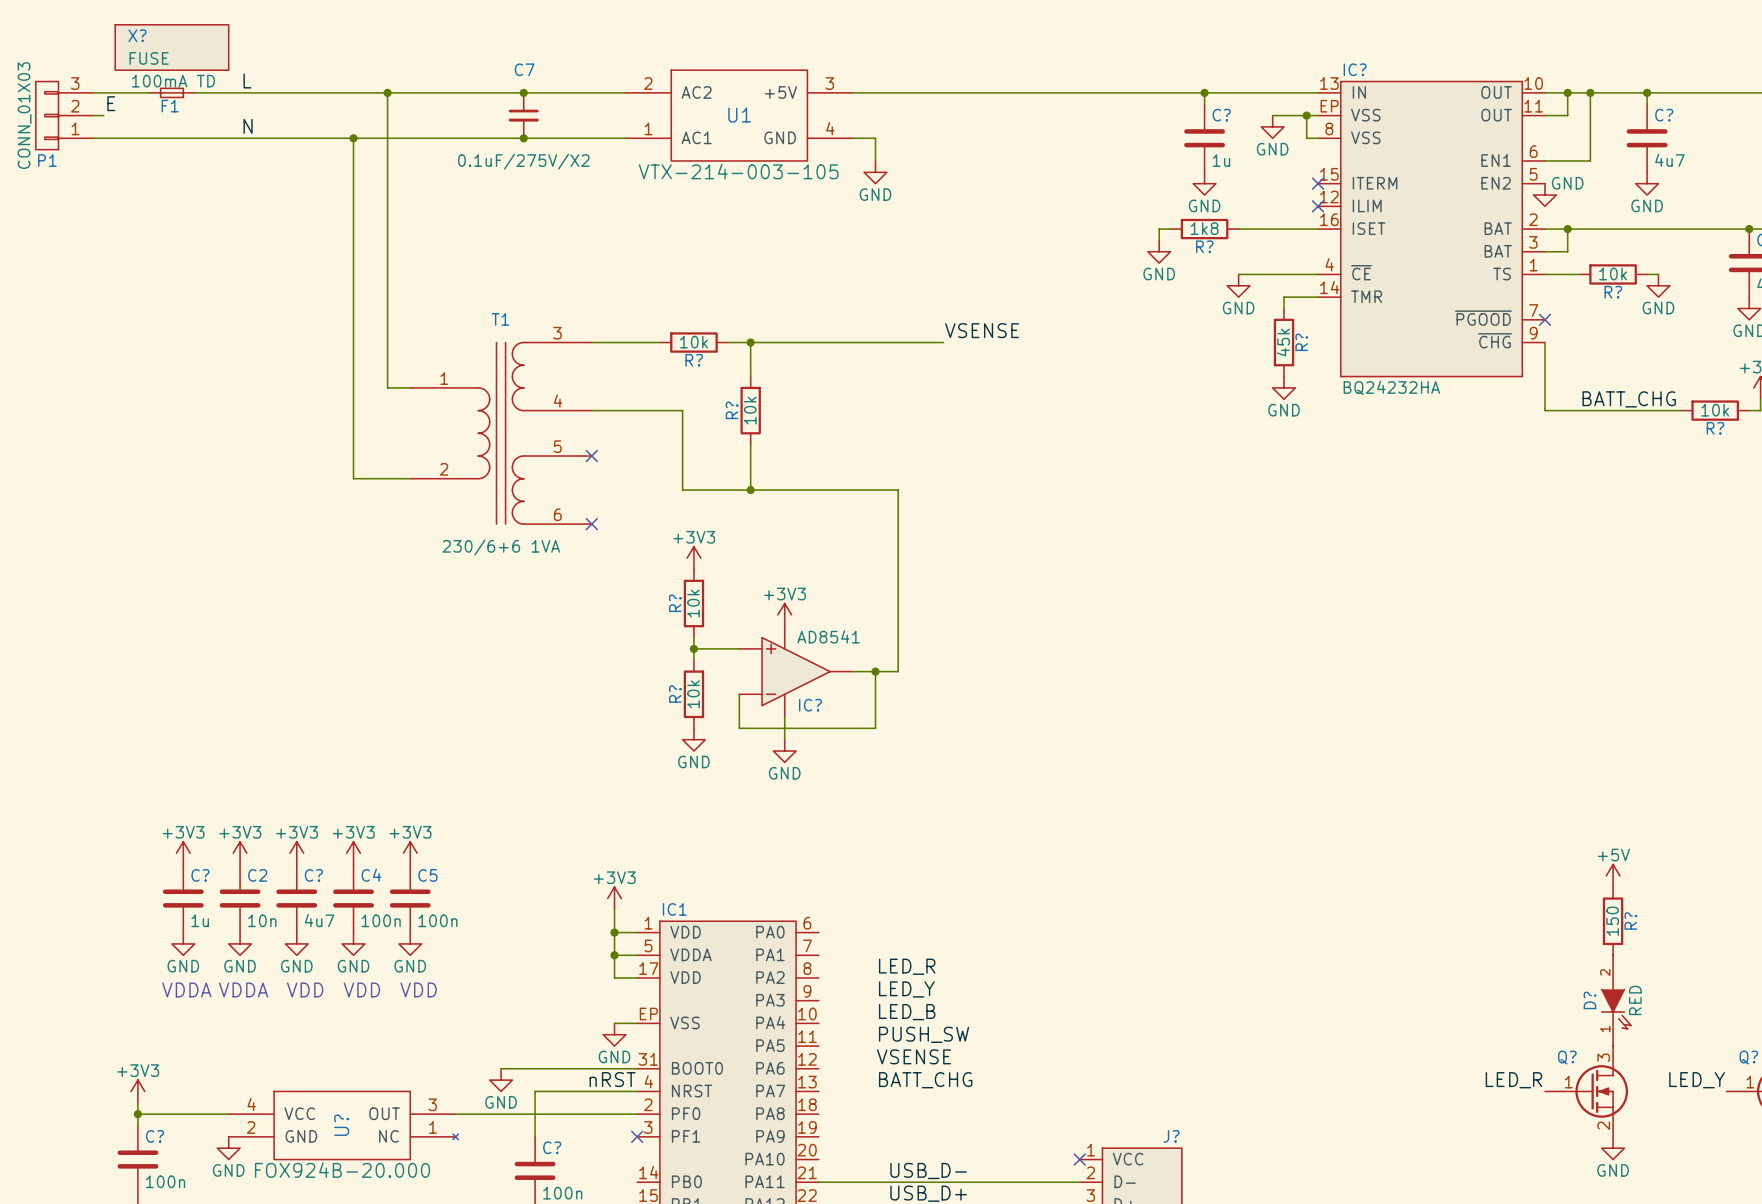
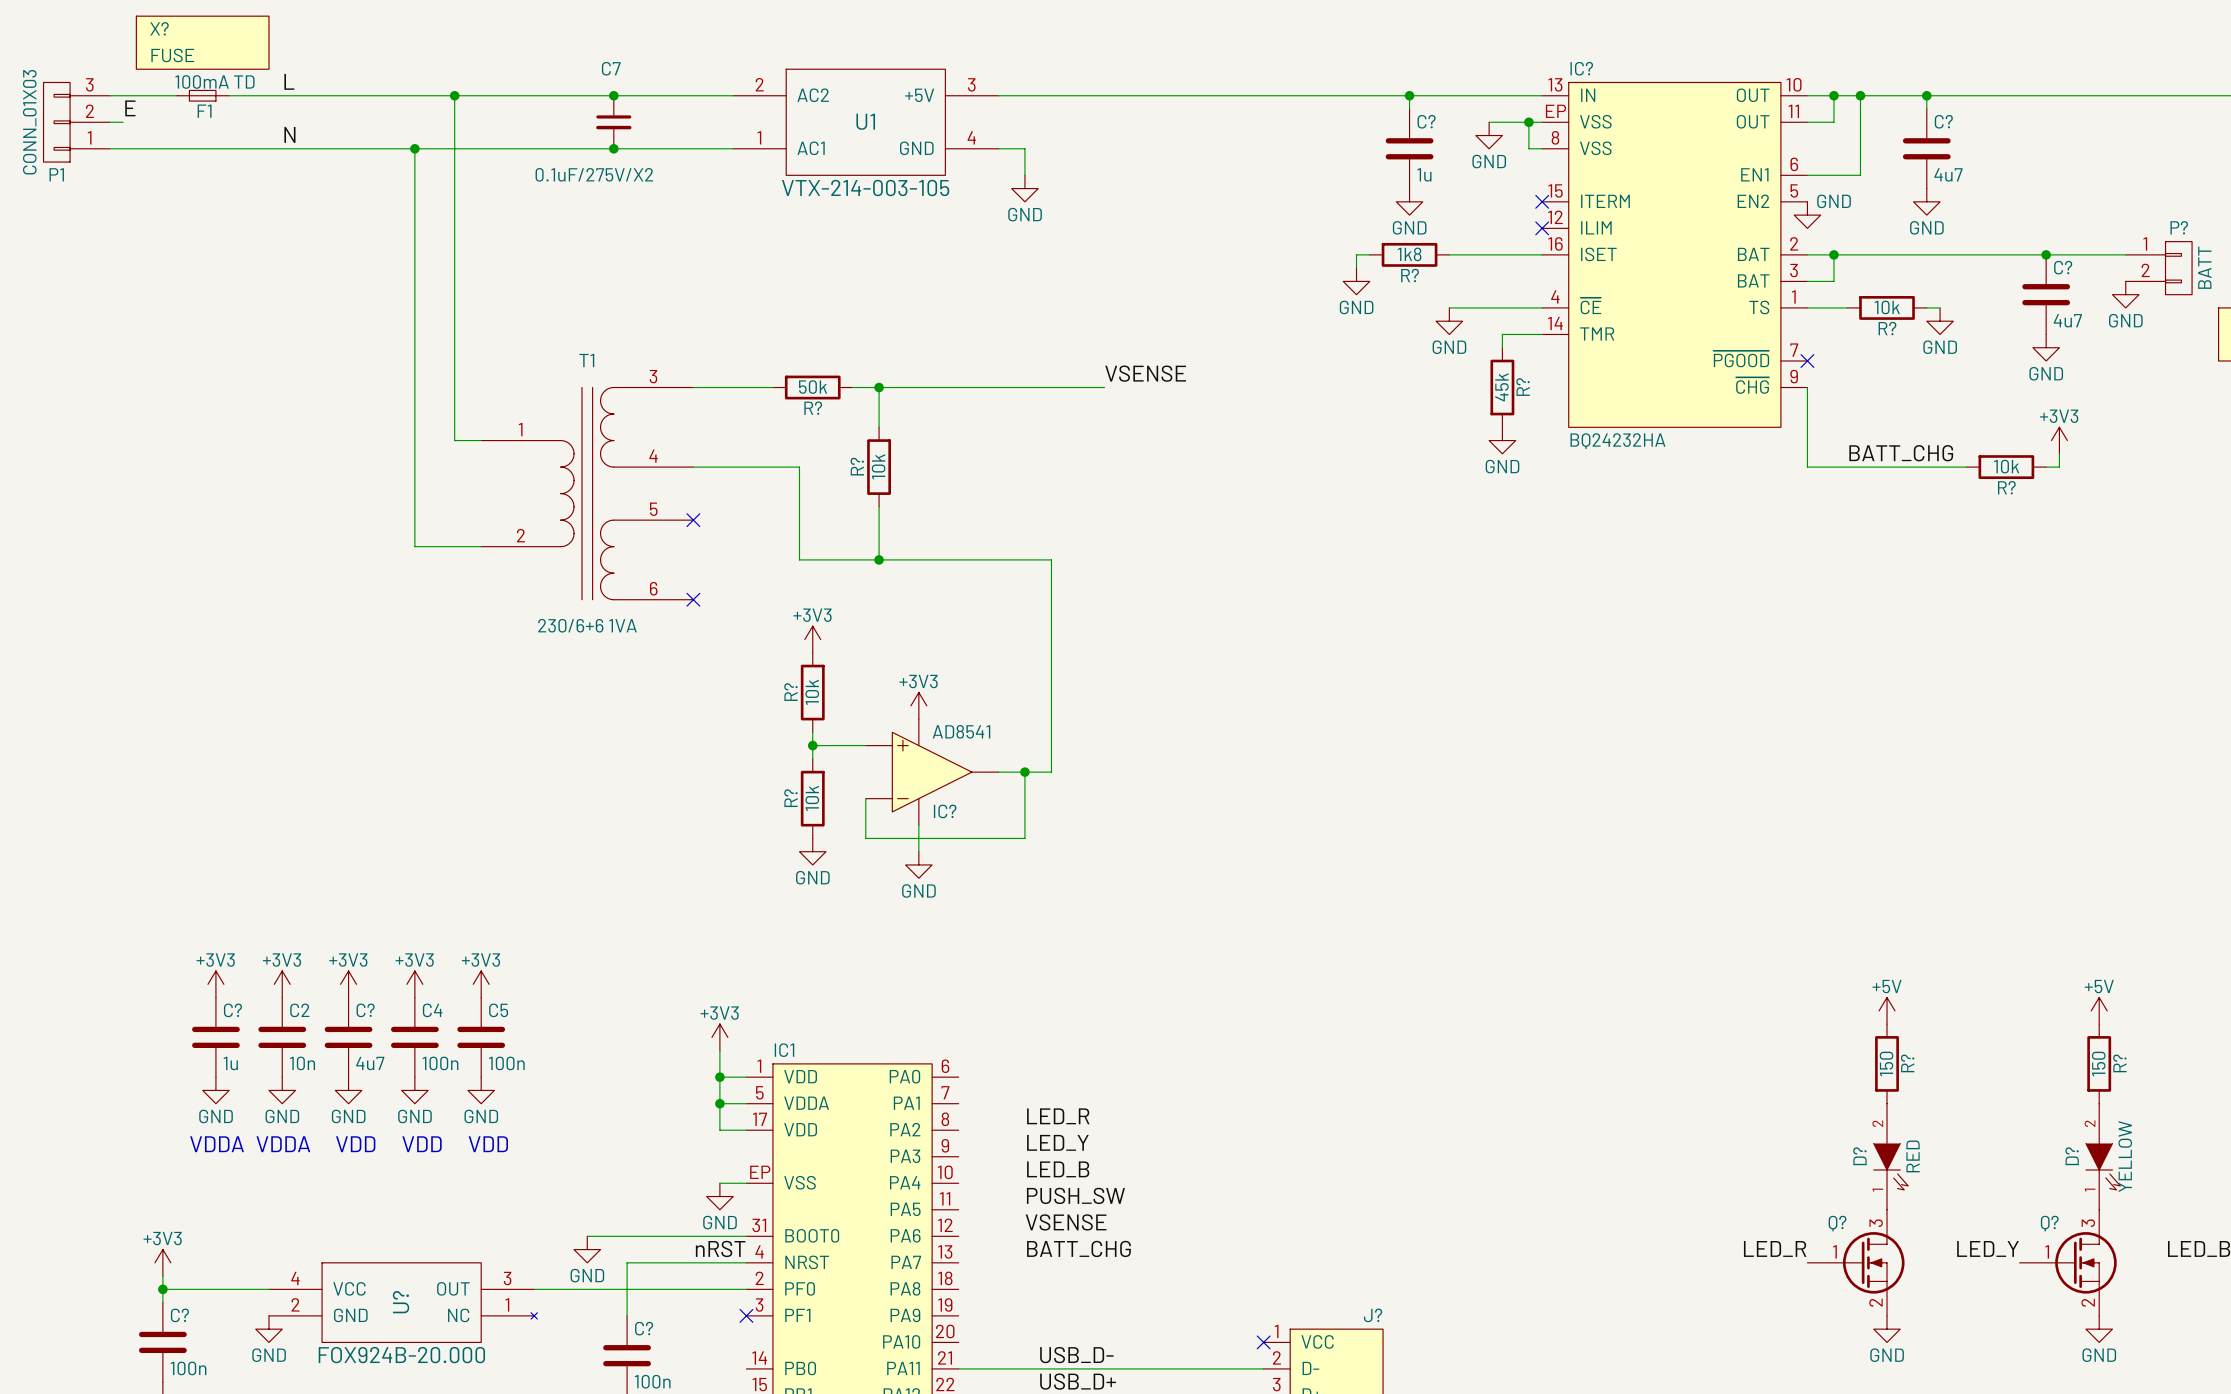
R? value: 10k (693, 342) -> 50k (813, 387)

